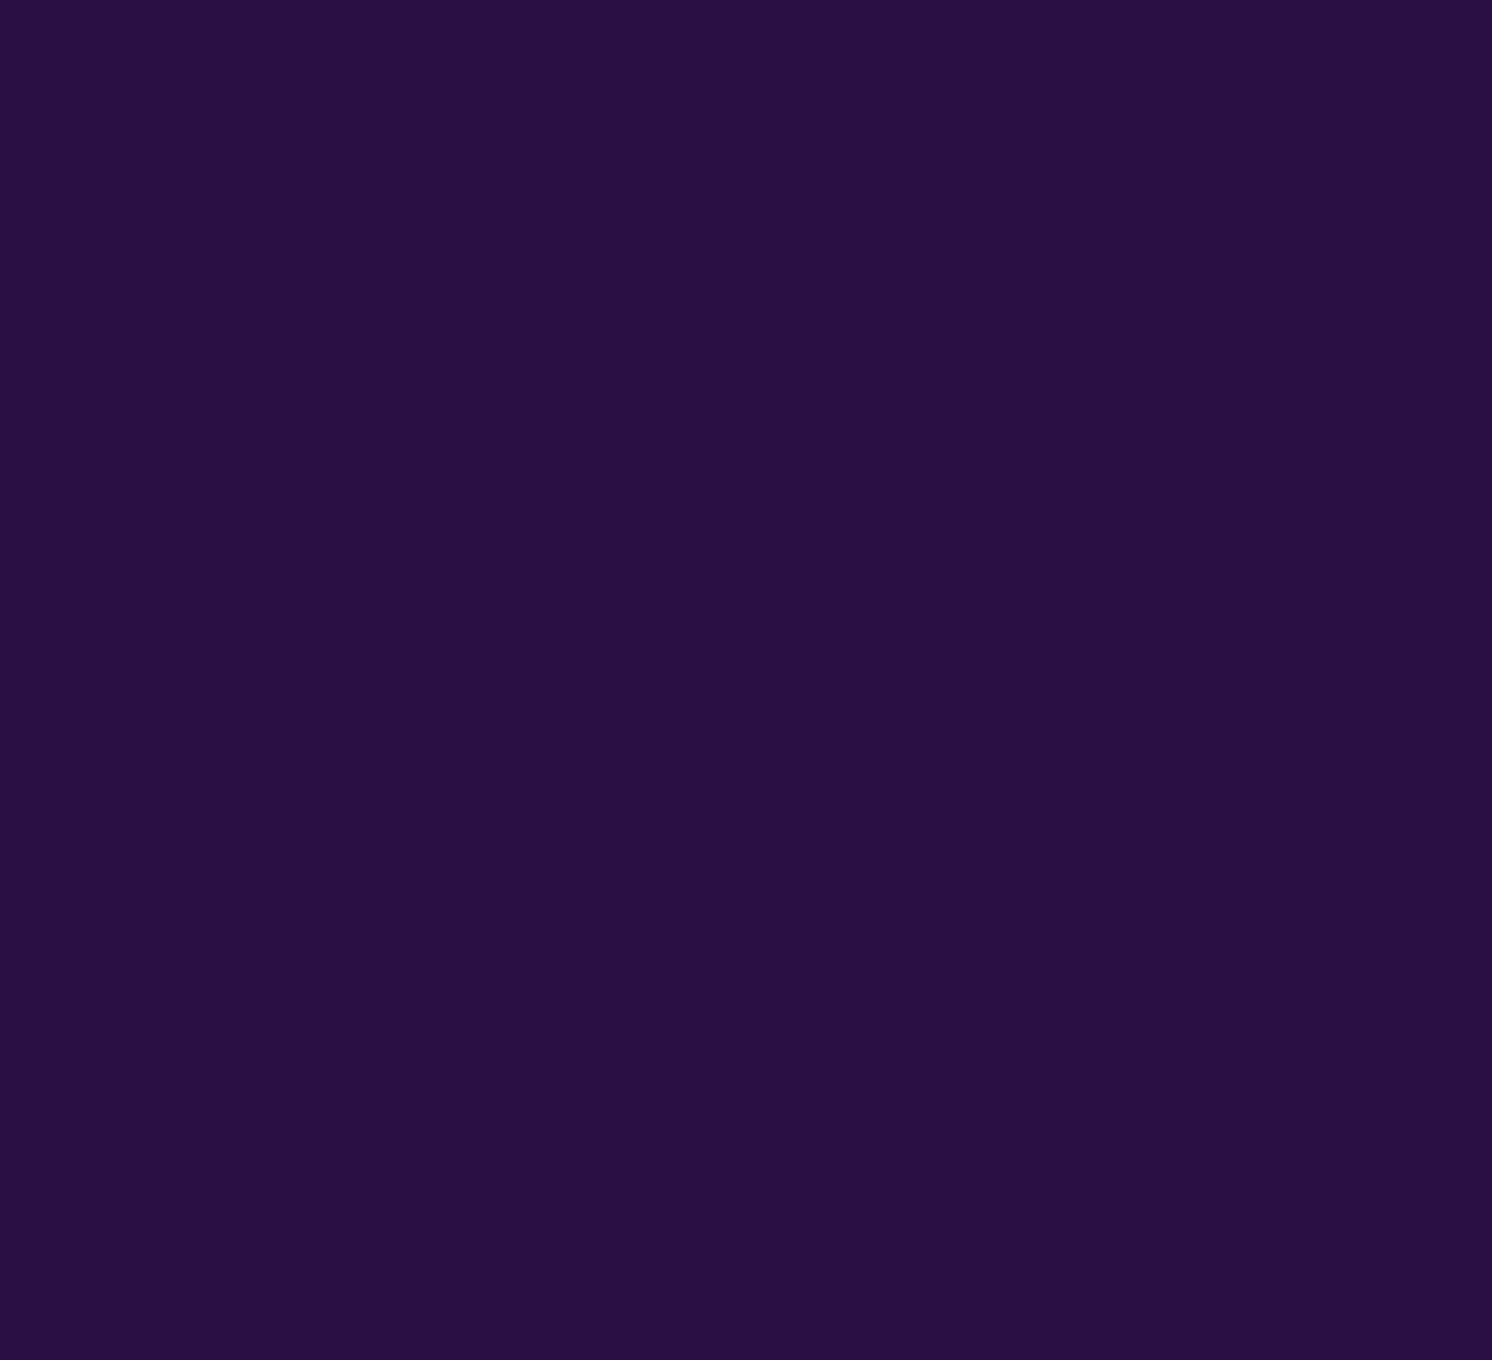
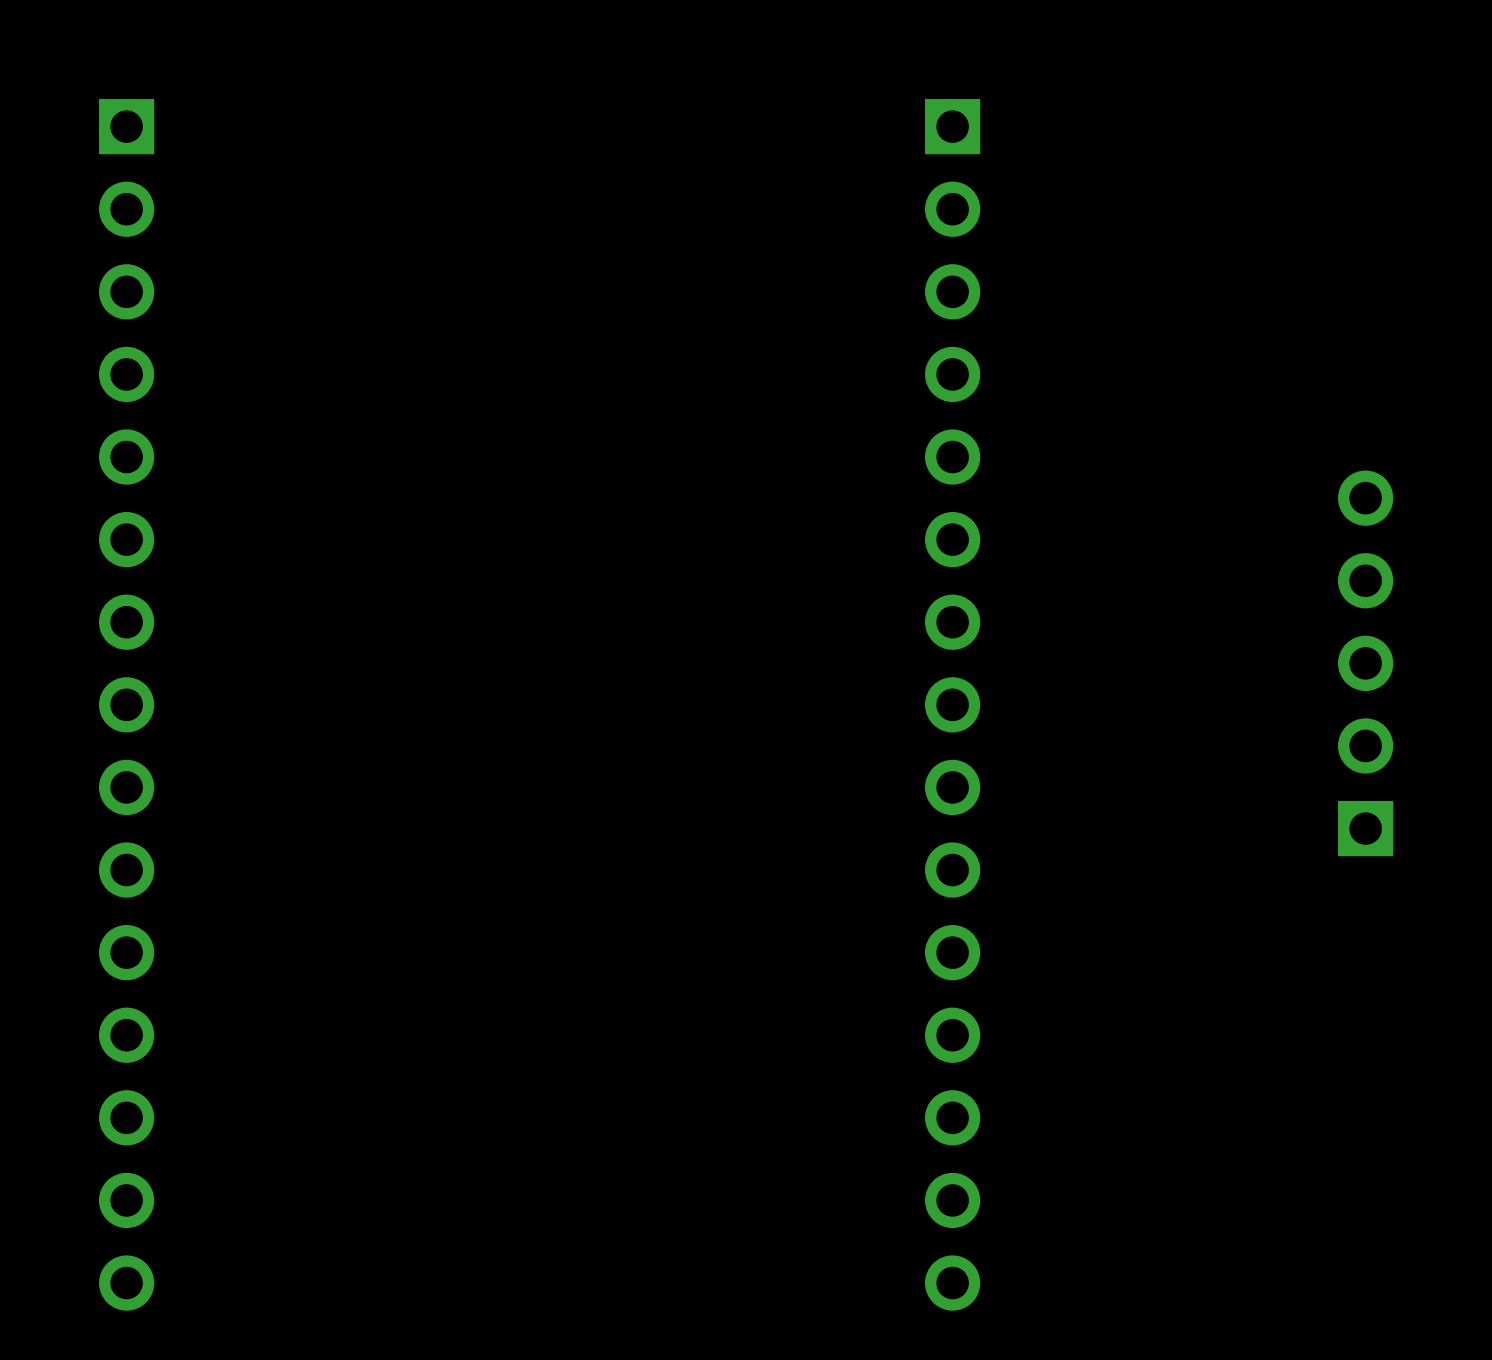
part: none -> (1365, 663)
part: none -> (126, 704)
part: none -> (952, 704)

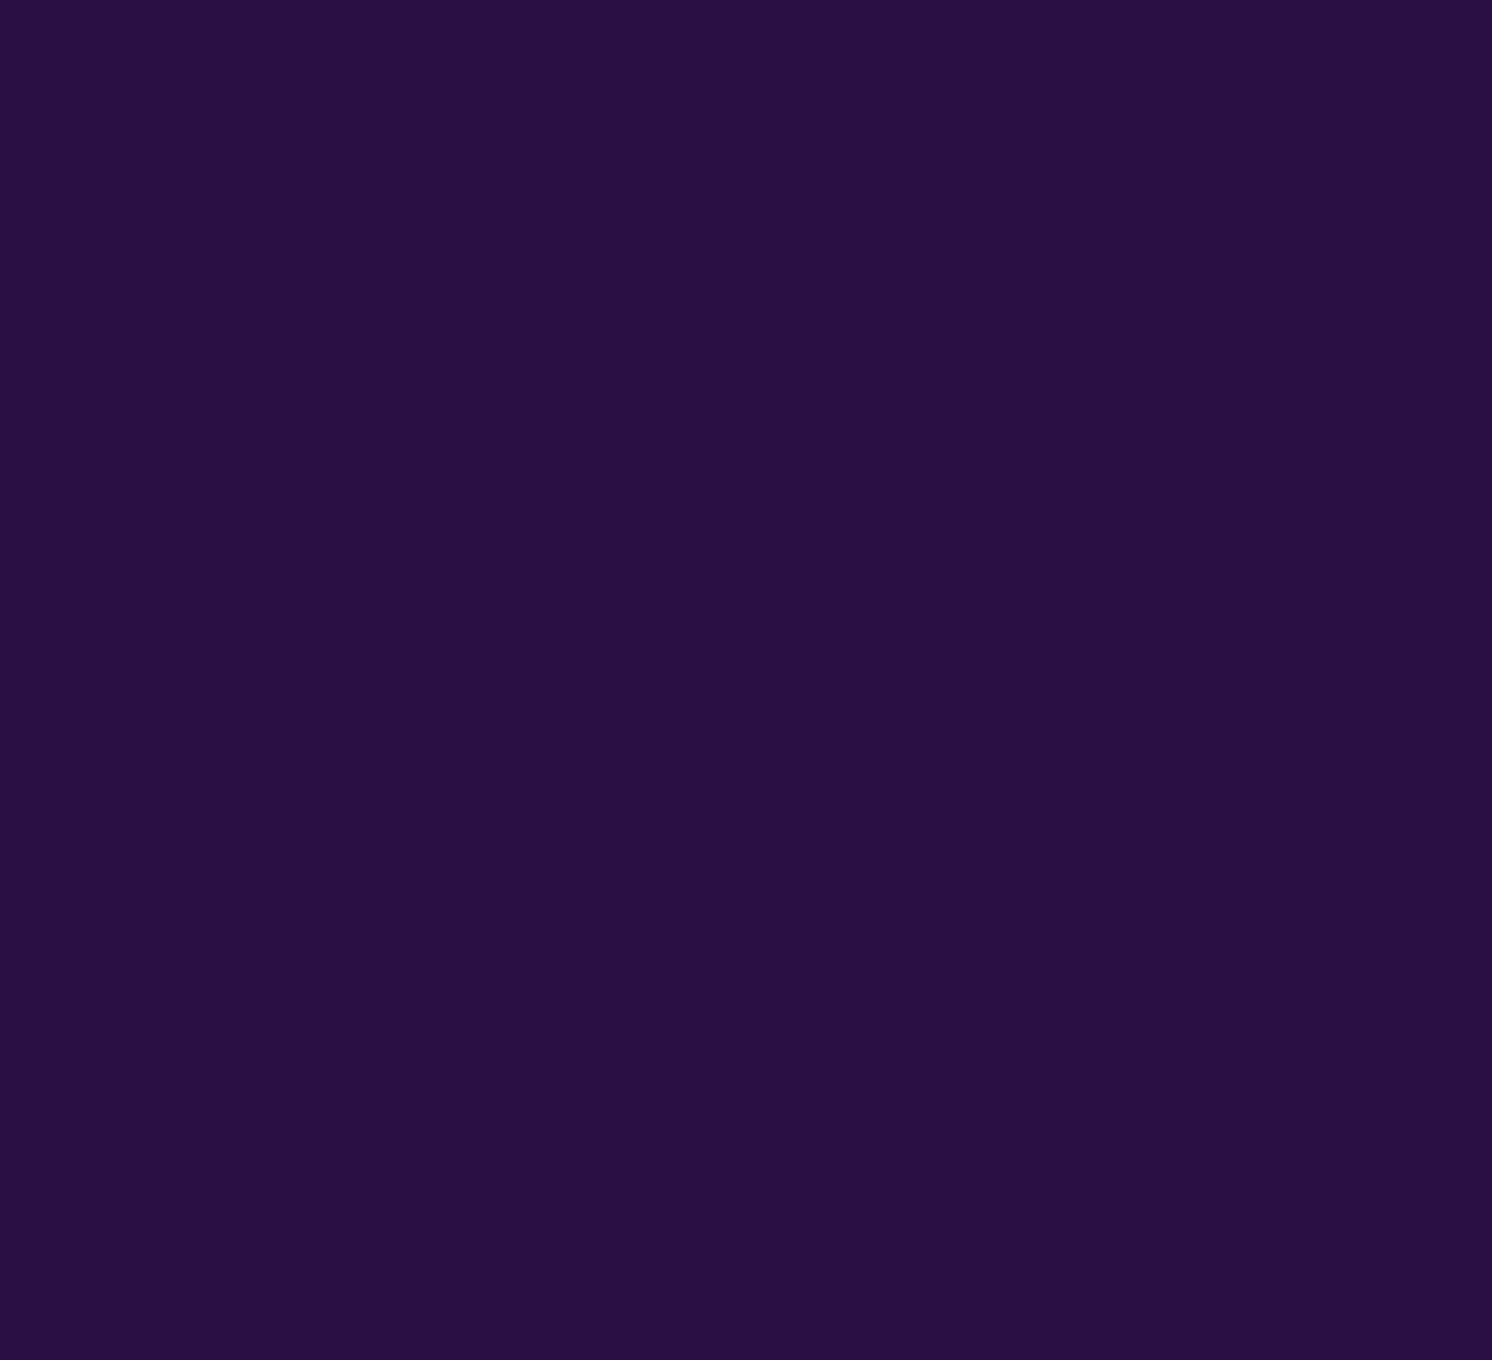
part: (1365, 663) -> none
part: (126, 704) -> none
part: (952, 704) -> none

